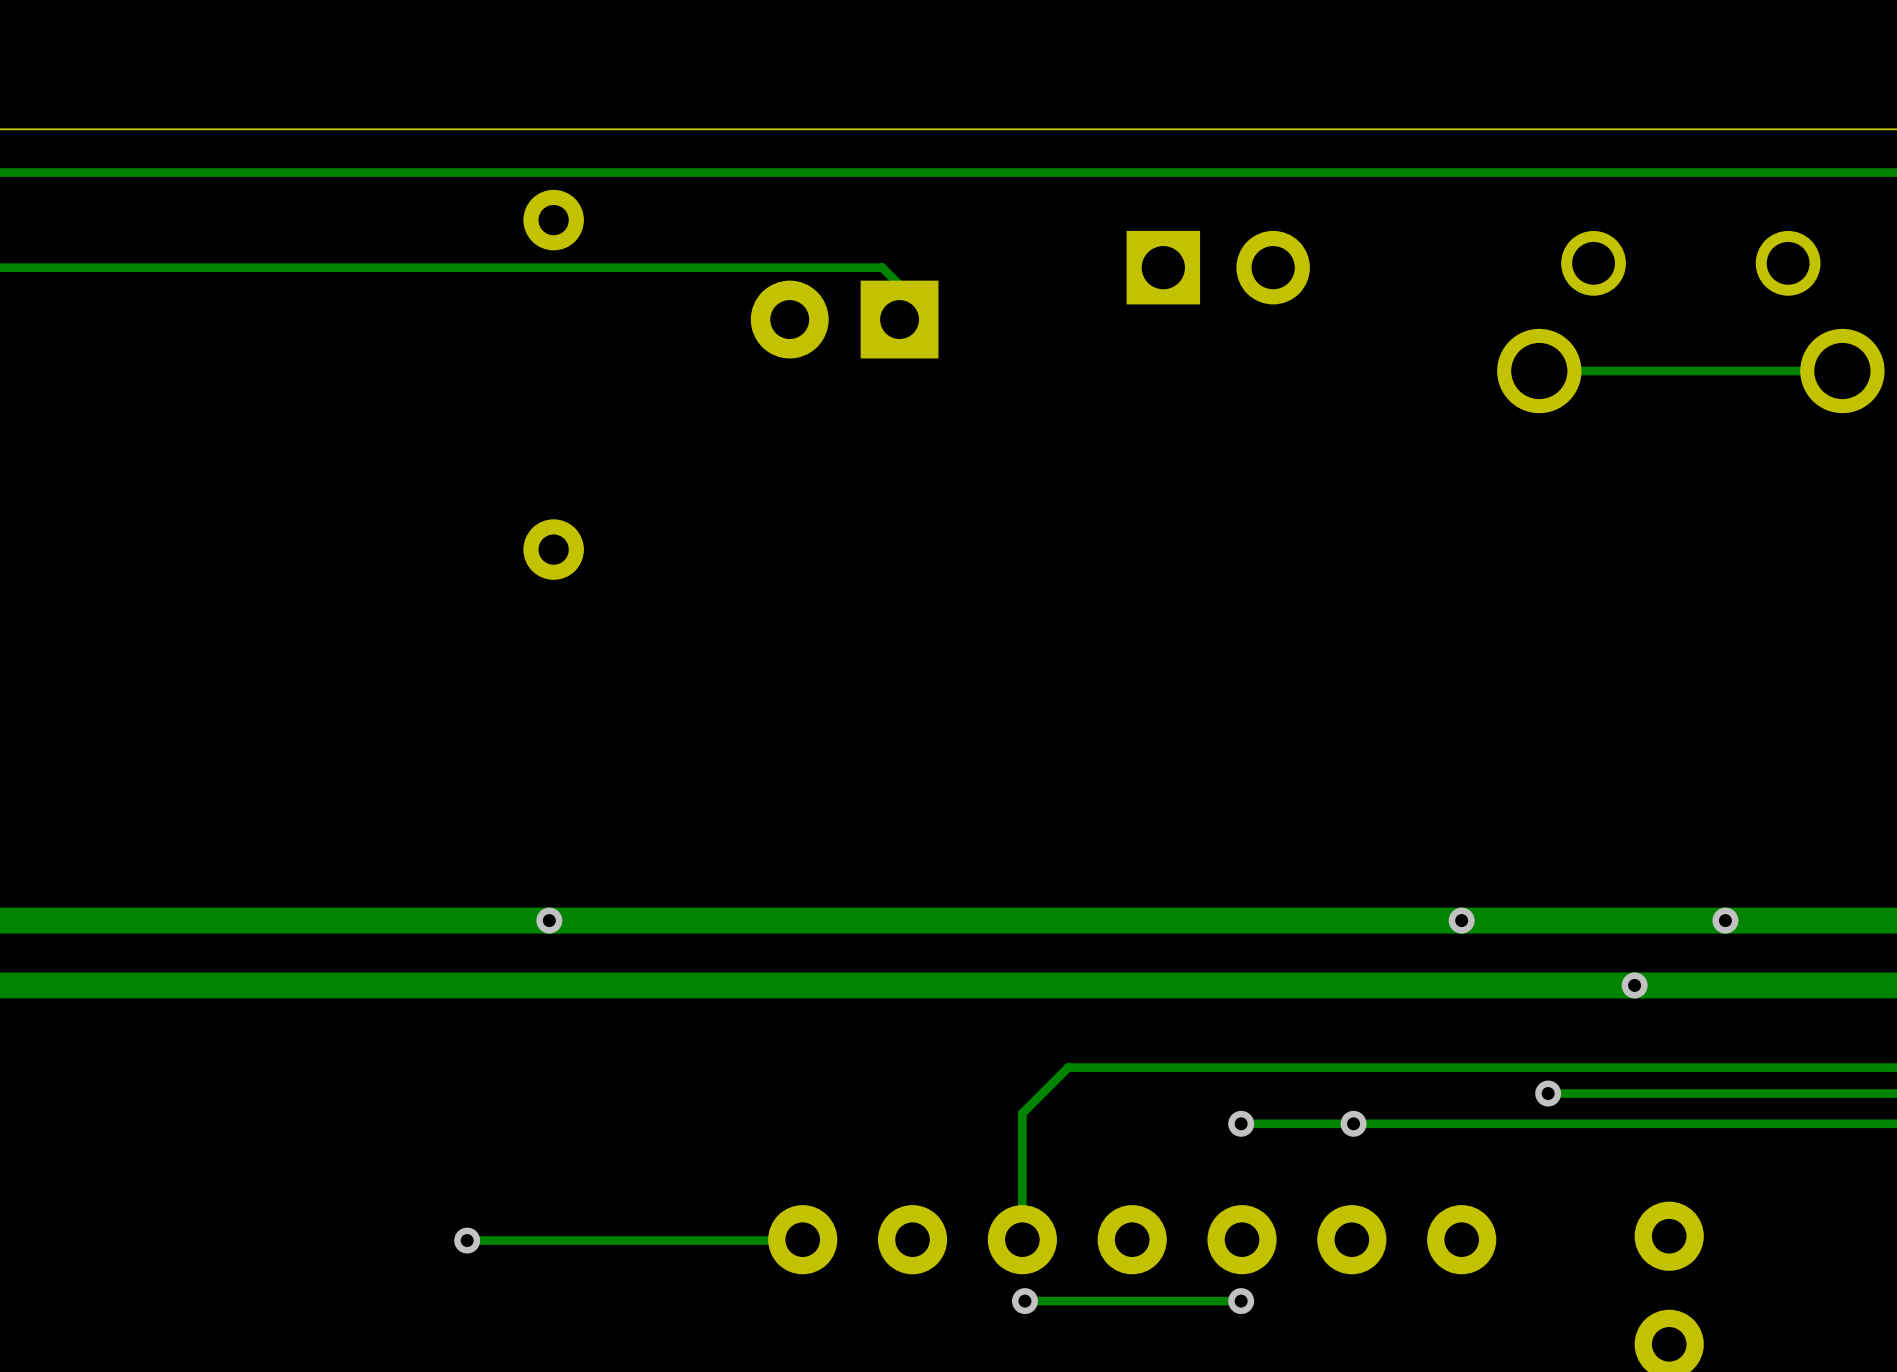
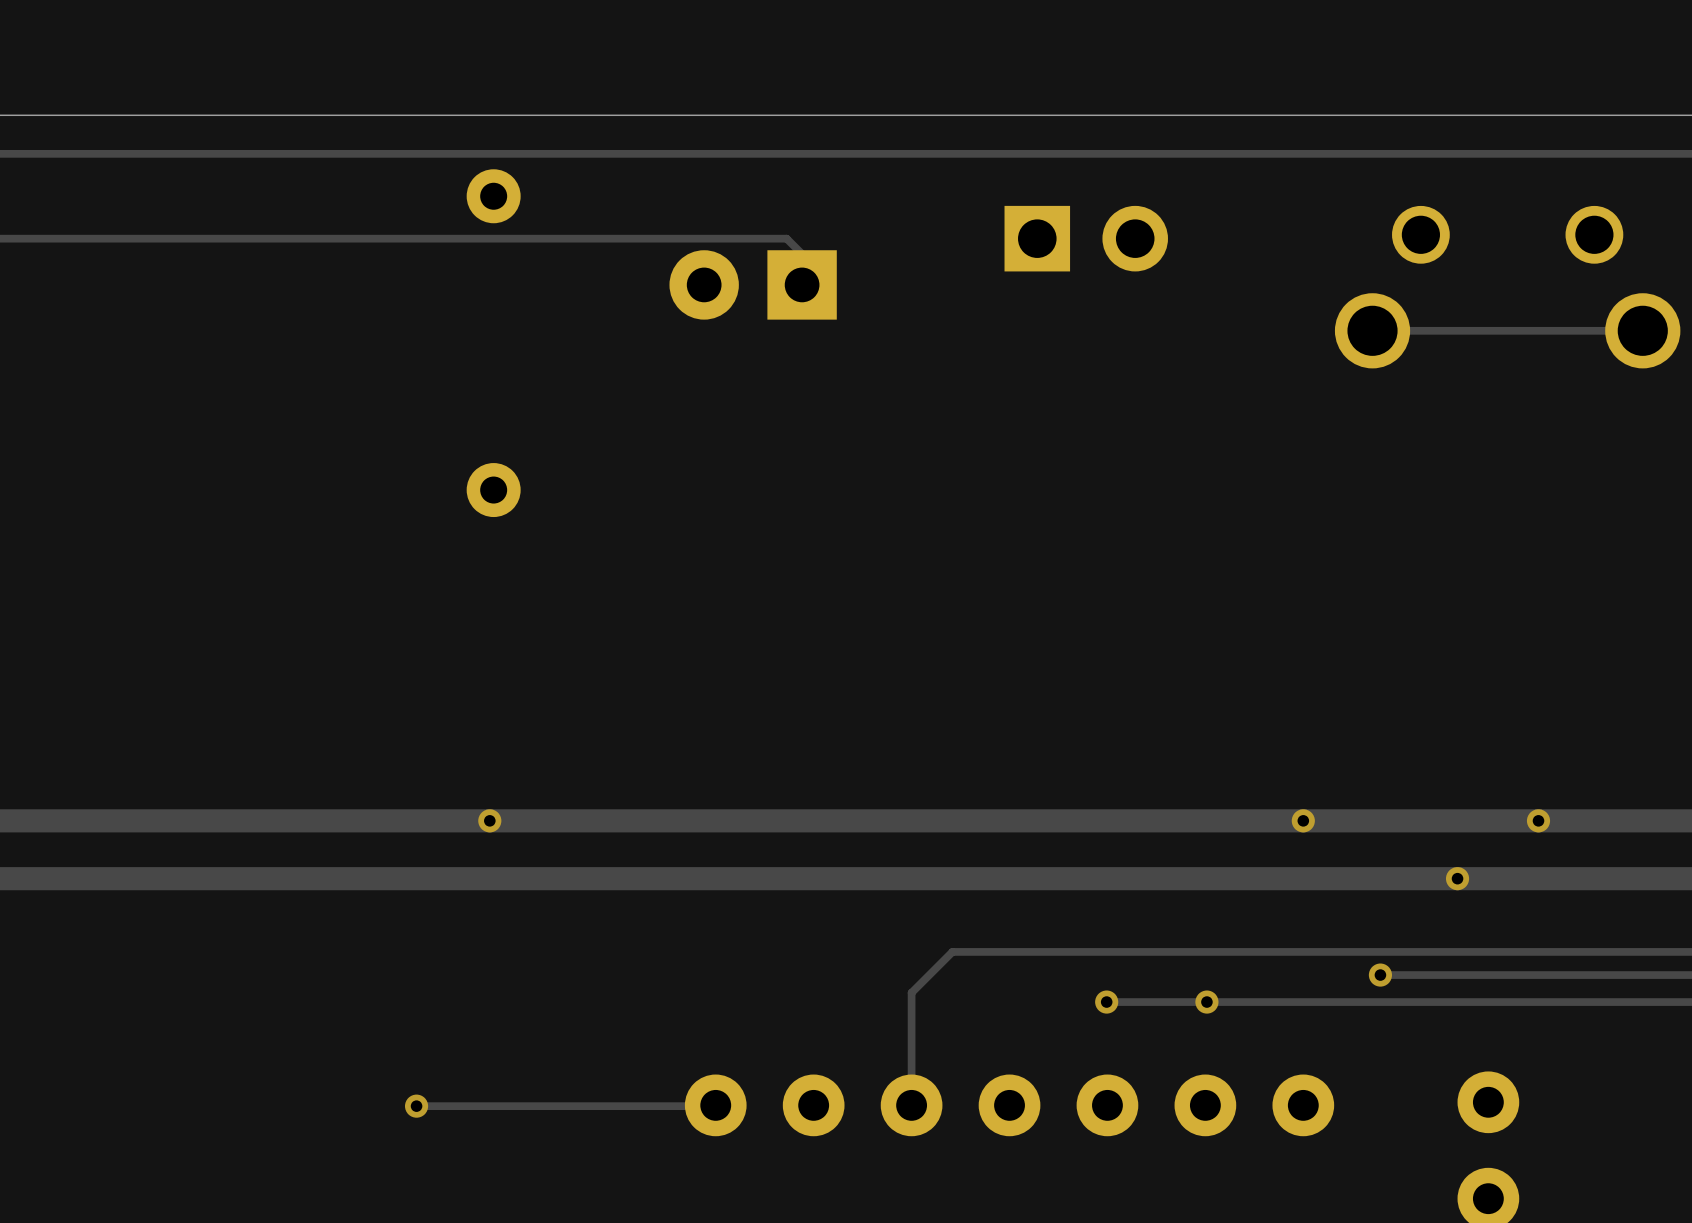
via: (1024, 1301) -> none
track: (1241, 1301) (1024, 1301) -> none
via: (1241, 1301) -> none

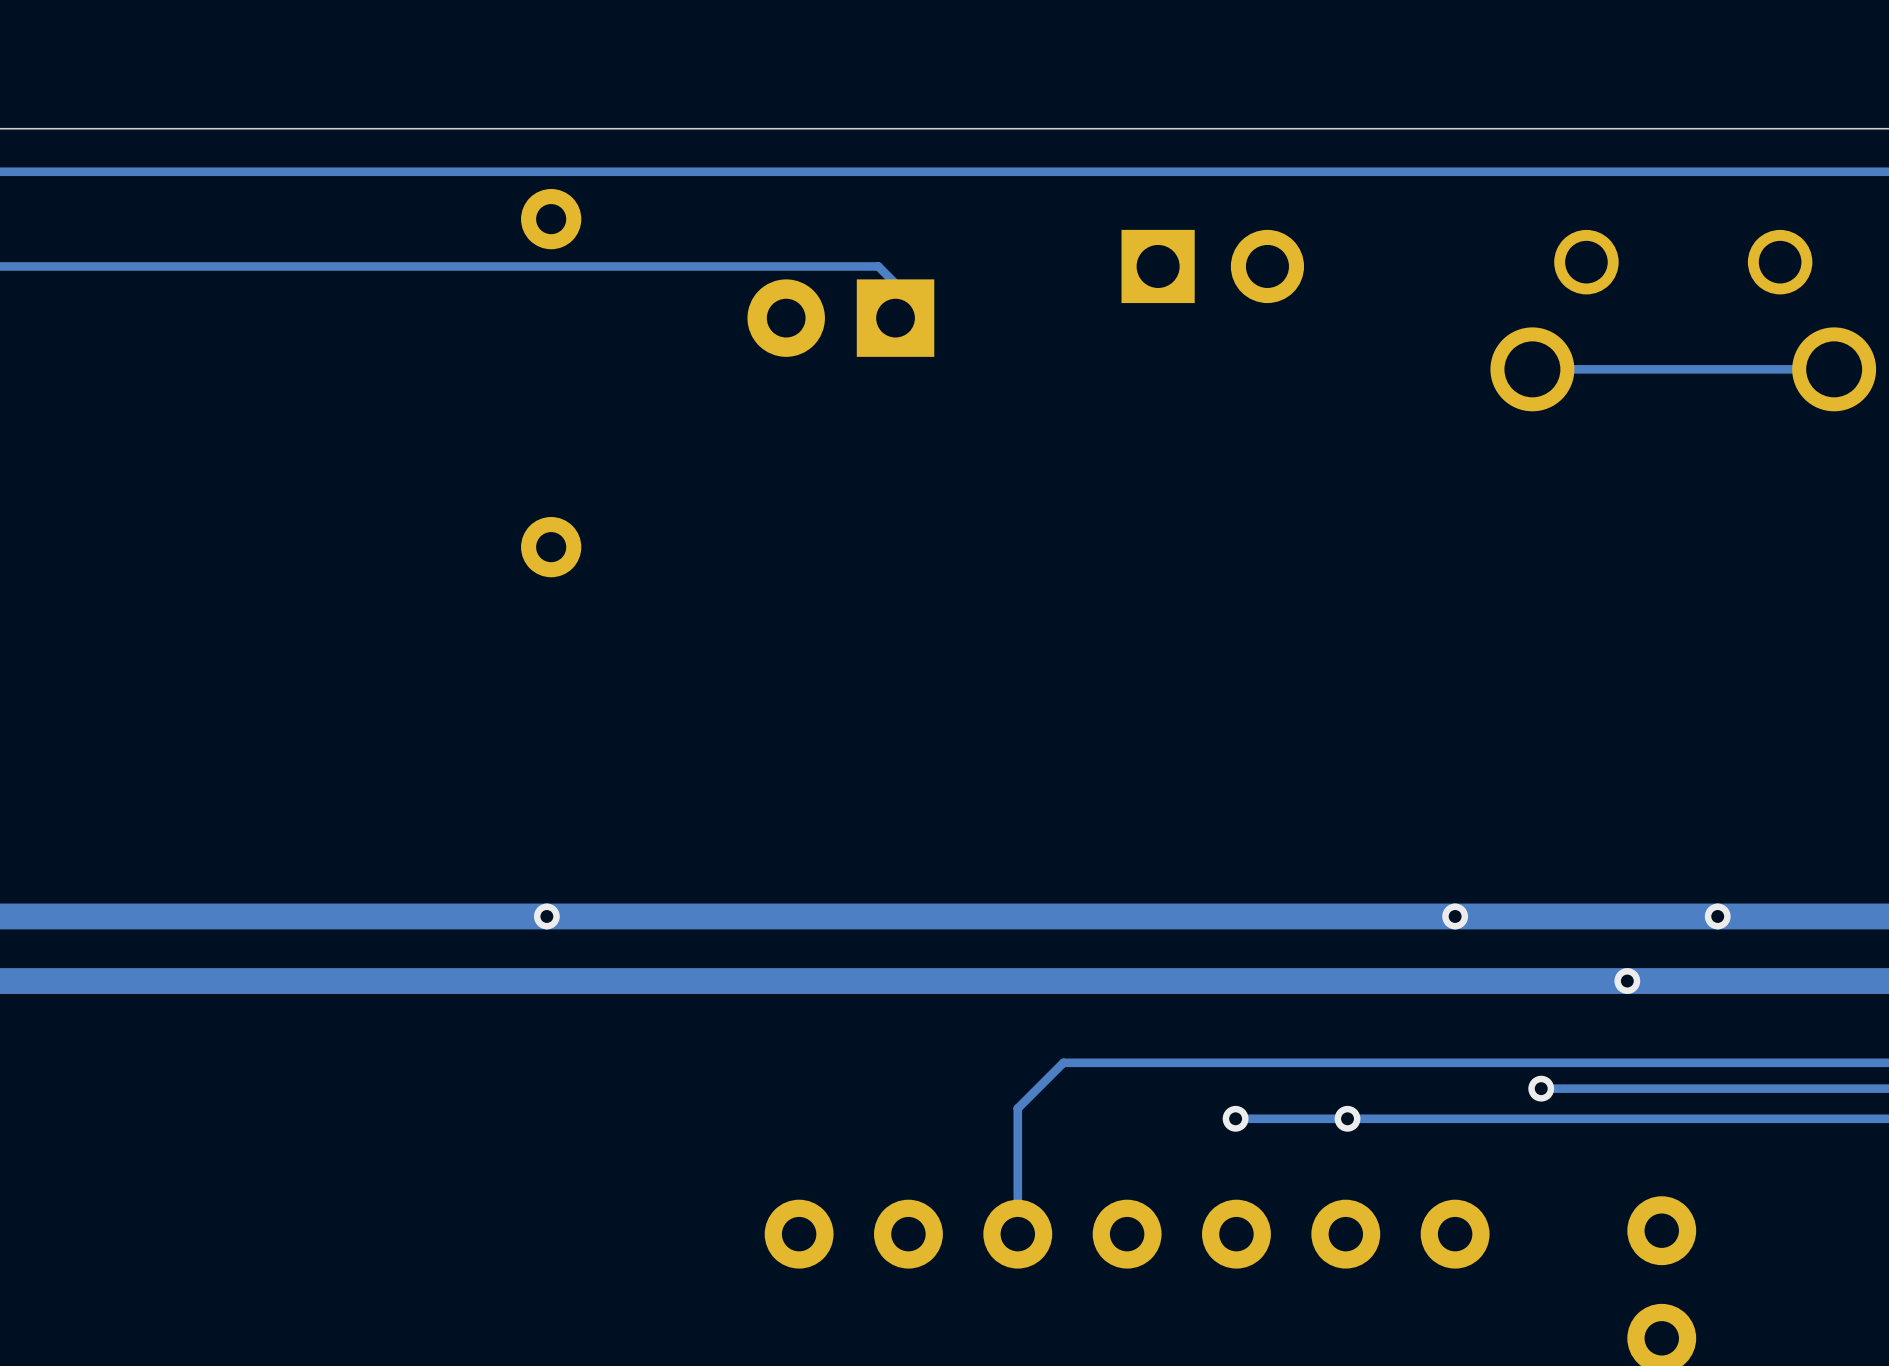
track: (715, 1105) (416, 1106) -> none
via: (416, 1106) -> none

